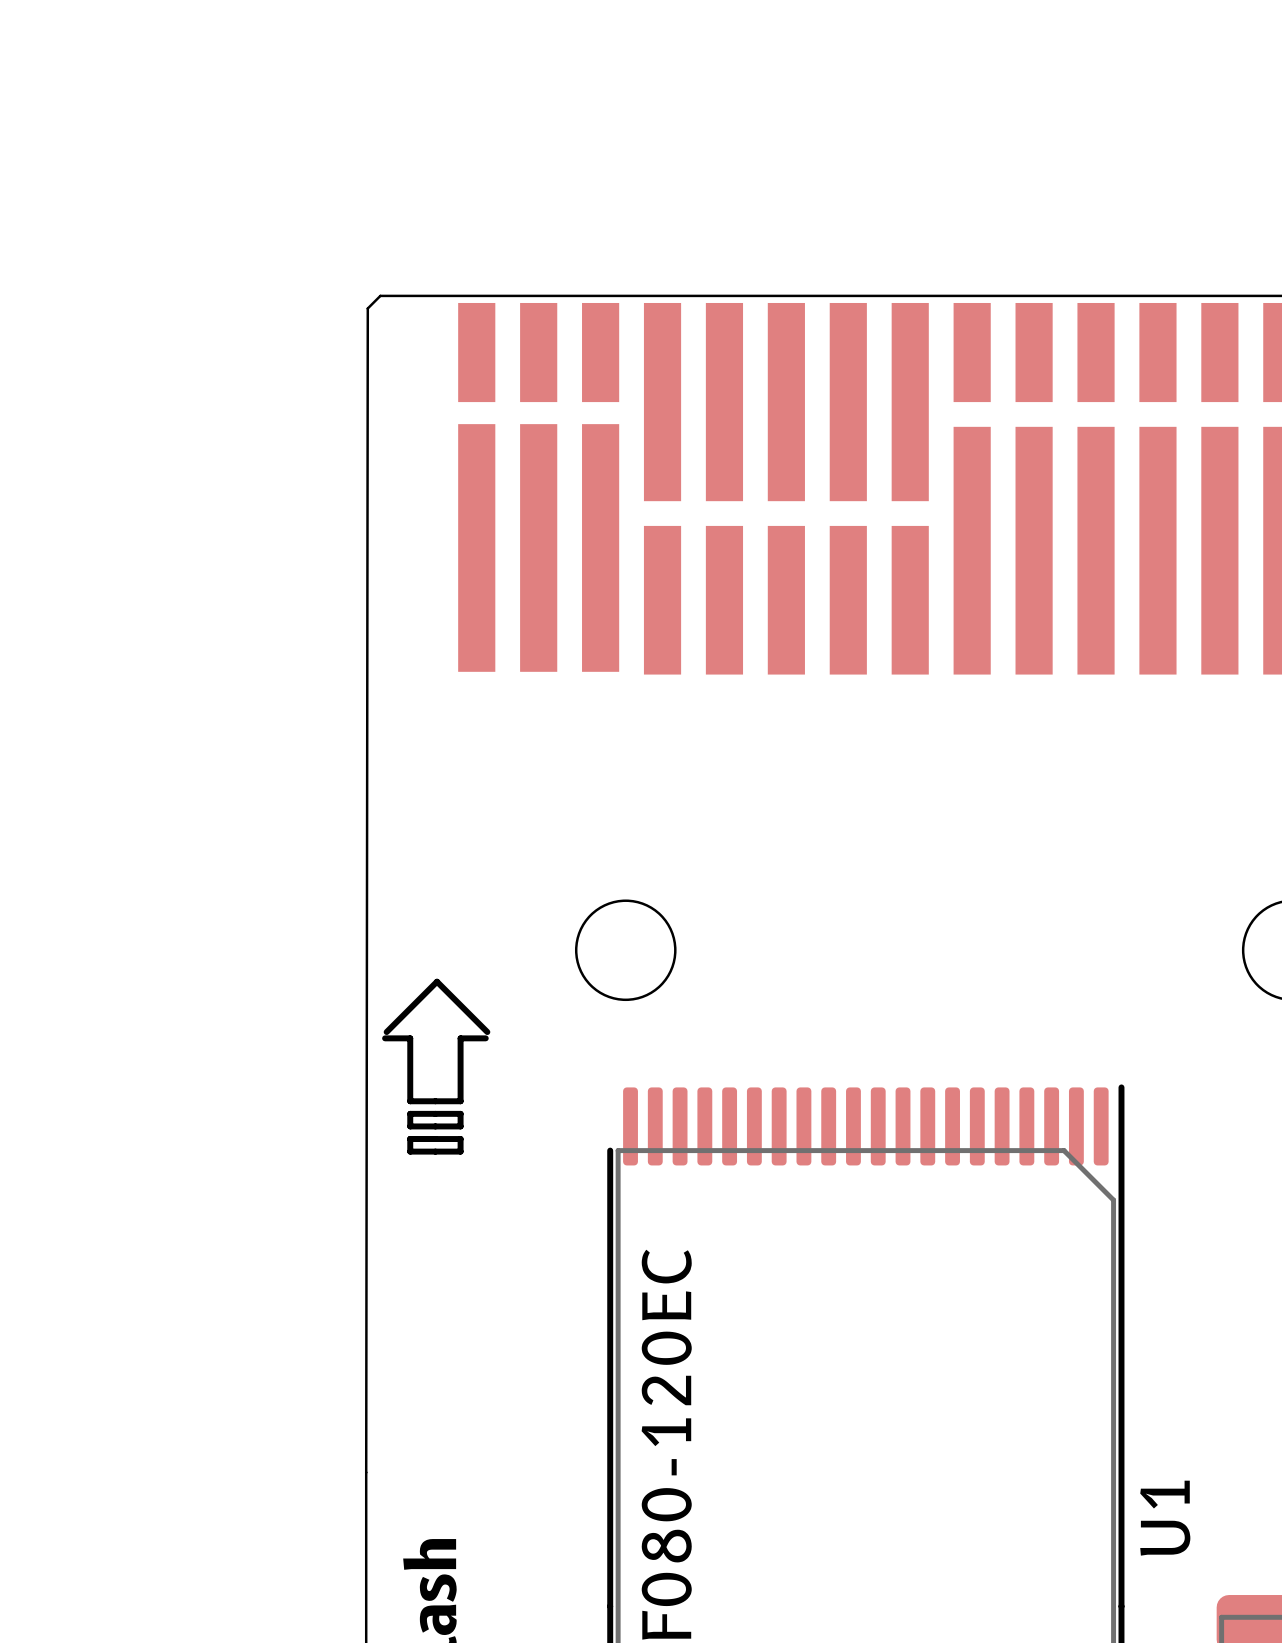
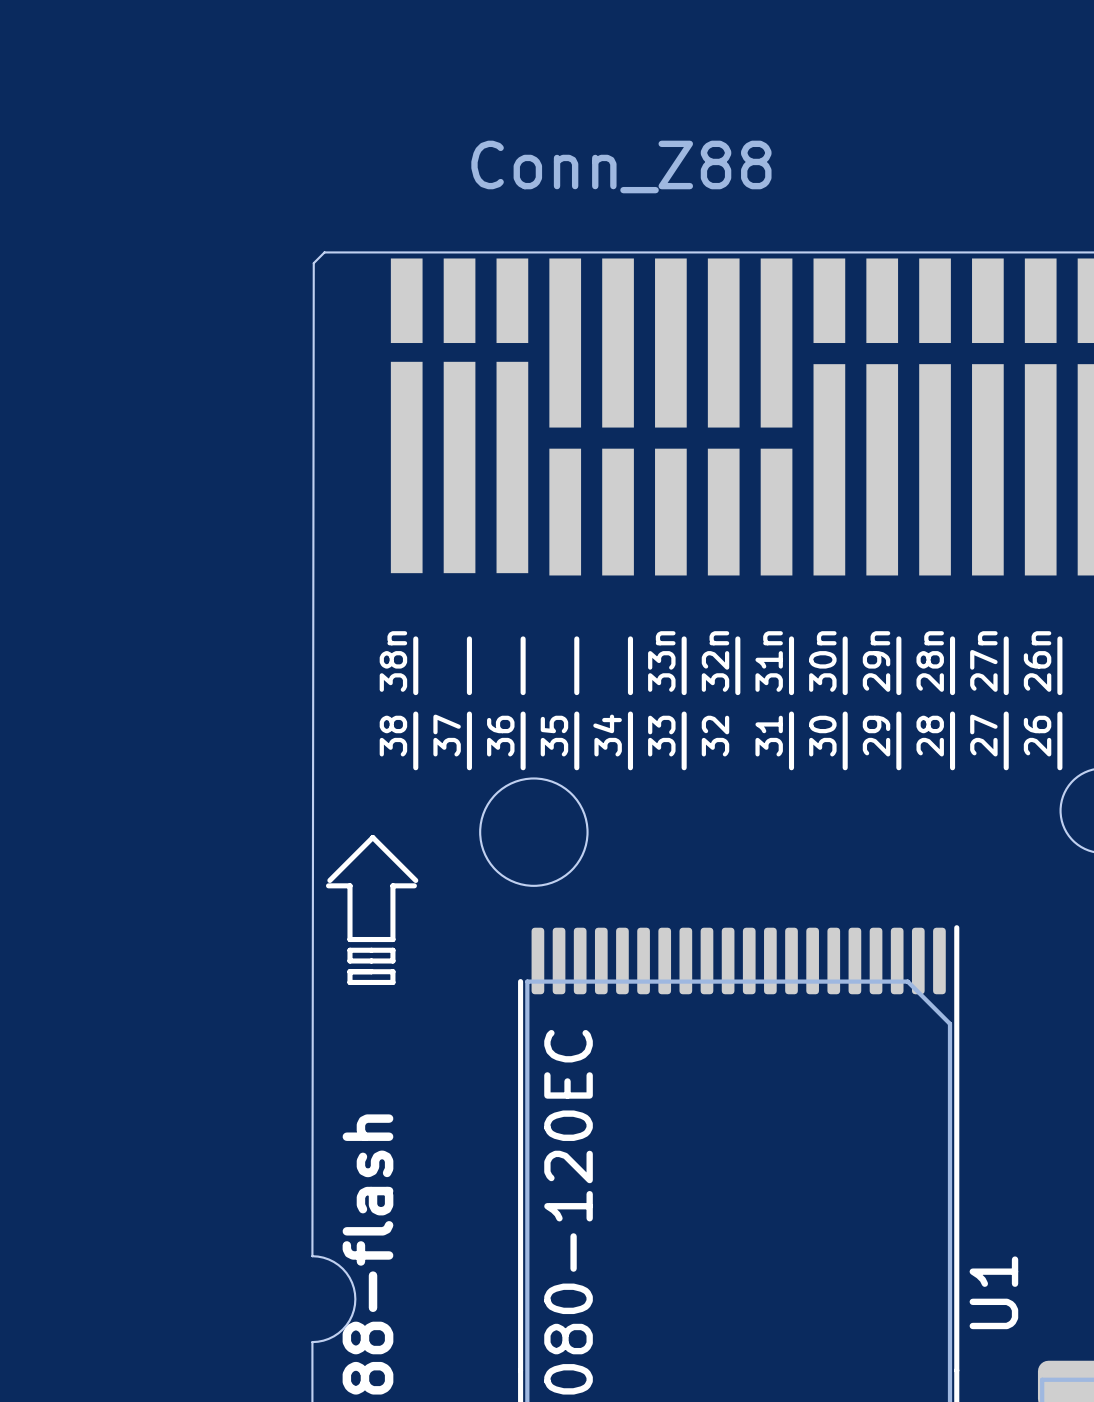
part value: none -> Conn_Z88 (621, 166)
line: none -> (415, 638) (415, 692)
line: none -> (469, 638) (469, 692)
line: none -> (523, 638) (523, 692)
line: none -> (576, 638) (576, 692)
line: none -> (630, 638) (630, 692)
line: none -> (684, 638) (684, 692)
line: none -> (737, 638) (737, 692)
line: none -> (791, 638) (791, 692)
line: none -> (845, 638) (845, 692)
line: none -> (898, 638) (898, 692)
line: none -> (952, 638) (952, 692)
line: none -> (1006, 638) (1006, 692)
line: none -> (1059, 638) (1059, 692)
text: none -> 38n (393, 661)
text: none -> 33n (661, 661)
text: none -> 32n (715, 661)
text: none -> 31n (769, 661)
text: none -> 30n (822, 661)
text: none -> 29n (876, 661)
text: none -> 28n (930, 661)
text: none -> 27n (983, 661)
text: none -> 26n (1037, 661)
line: none -> (415, 714) (415, 767)
line: none -> (469, 714) (469, 767)
line: none -> (523, 714) (523, 767)
line: none -> (576, 714) (576, 767)
line: none -> (630, 714) (630, 767)
line: none -> (684, 714) (684, 767)
line: none -> (791, 714) (791, 767)
line: none -> (845, 714) (845, 767)
line: none -> (898, 714) (898, 767)
line: none -> (952, 714) (952, 767)
line: none -> (1006, 714) (1006, 767)
line: none -> (1059, 714) (1059, 767)
text: none -> 38 (393, 736)
text: none -> 36 (500, 736)
text: none -> 37 (447, 735)
text: none -> 35 (554, 736)
text: none -> 34 (607, 735)
text: none -> 33 (661, 736)
text: none -> 32 (715, 736)
text: none -> 31 (769, 736)
text: none -> 30 (822, 736)
text: none -> 29 (876, 736)
text: none -> 28 (930, 736)
text: none -> 27 (983, 735)
text: none -> 26 (1037, 736)
round board edge size: [574, 899, 677, 1002] -> [479, 777, 589, 887]
board edge: (366, 1472) (366, 1573) -> (312, 1256) (328, 1259) (342, 1268) (352, 1282) (355, 1299) (352, 1315) (342, 1329) (328, 1338) (312, 1342)

